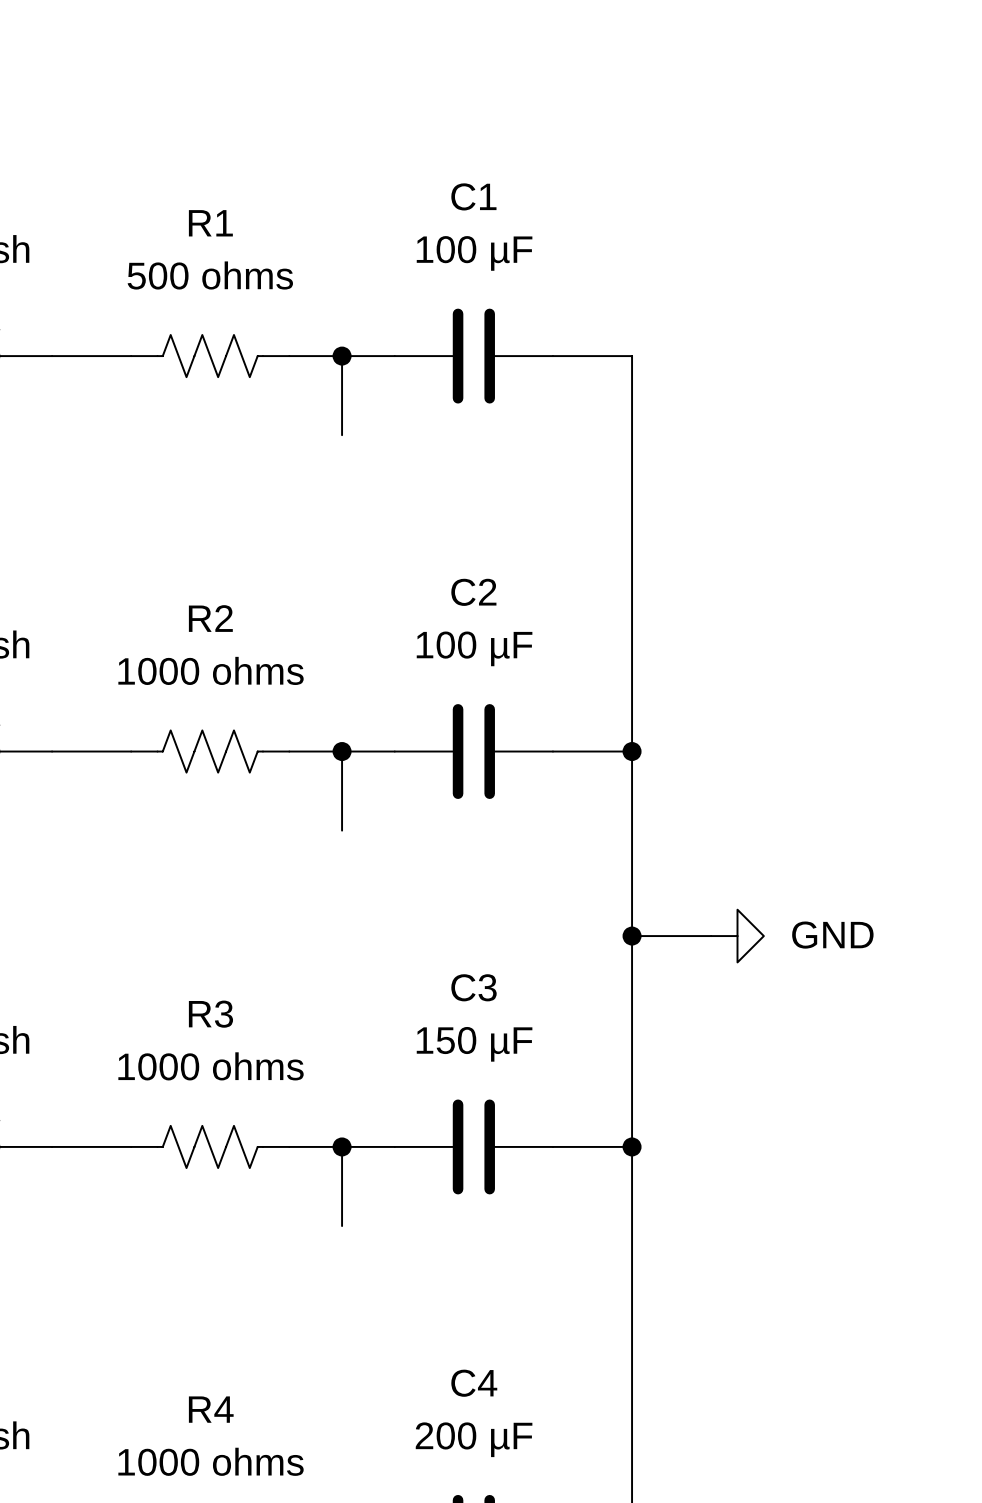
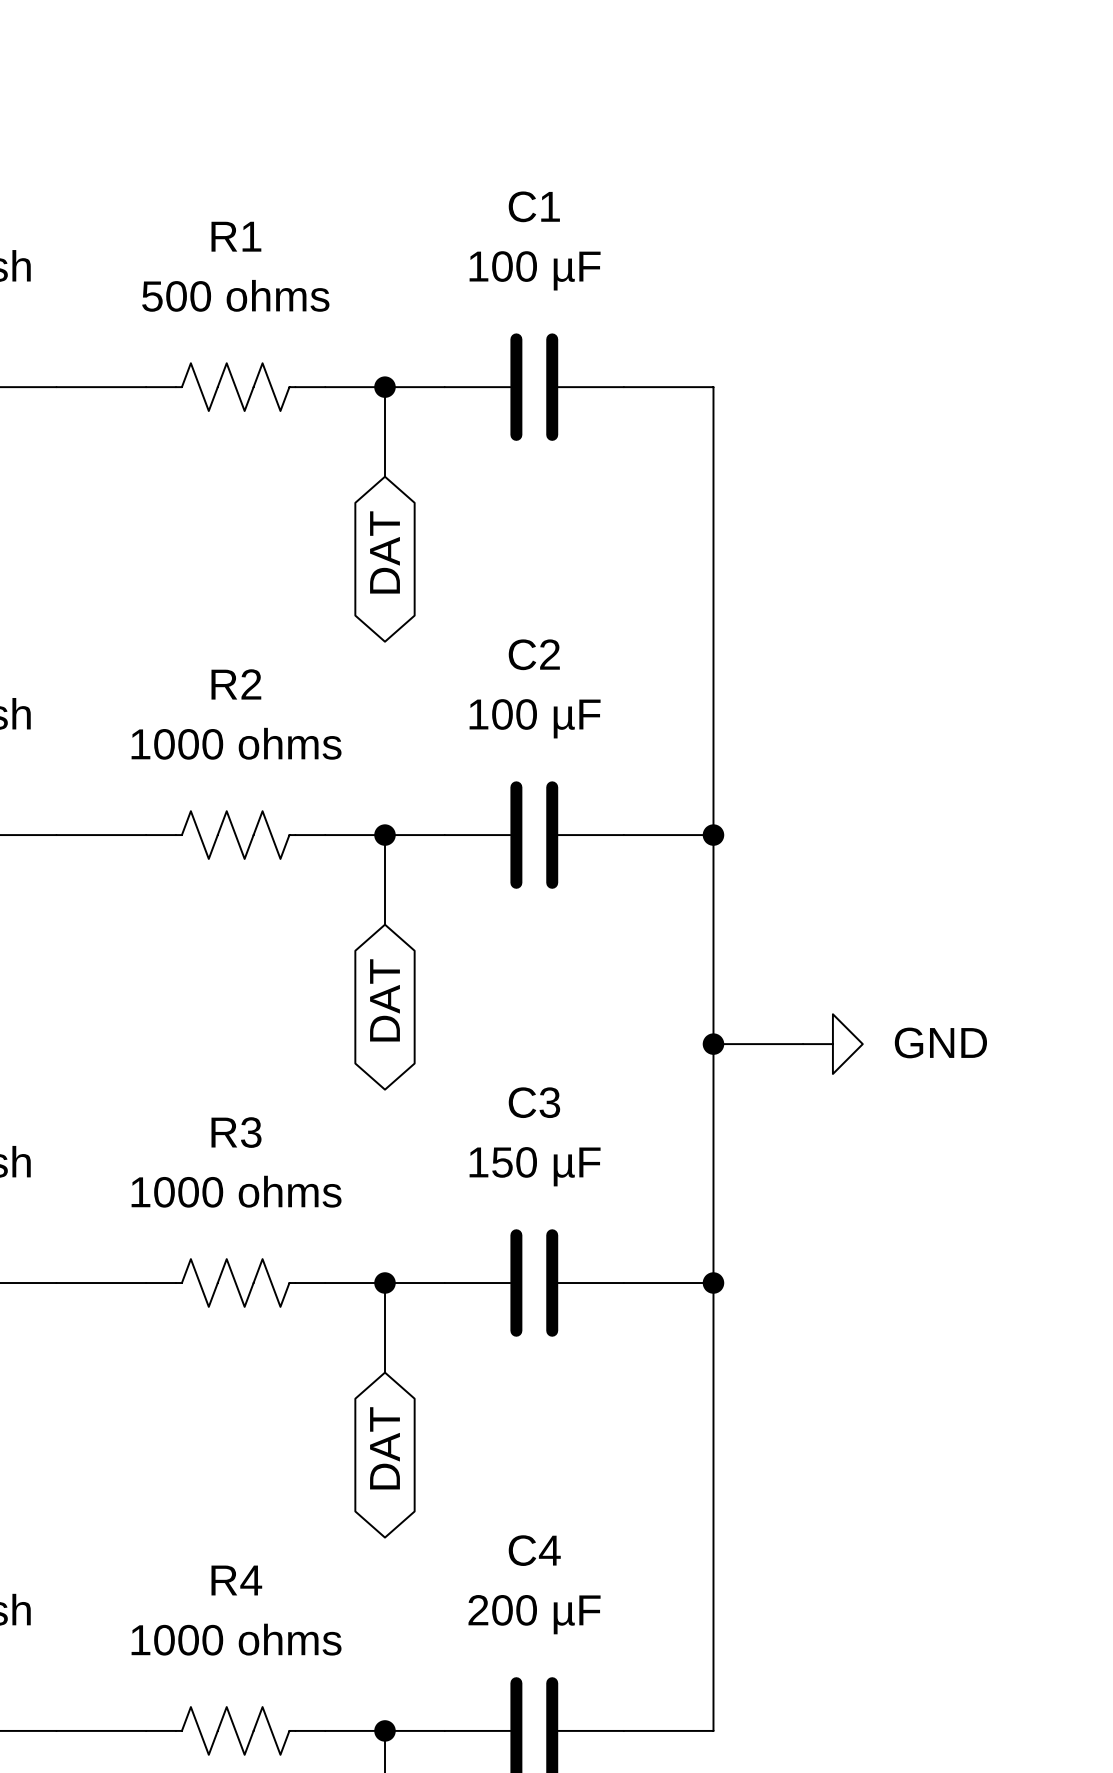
global label: none -> DAT (385, 552)
global label: none -> DAT (385, 1000)
global label: none -> DAT (385, 1448)

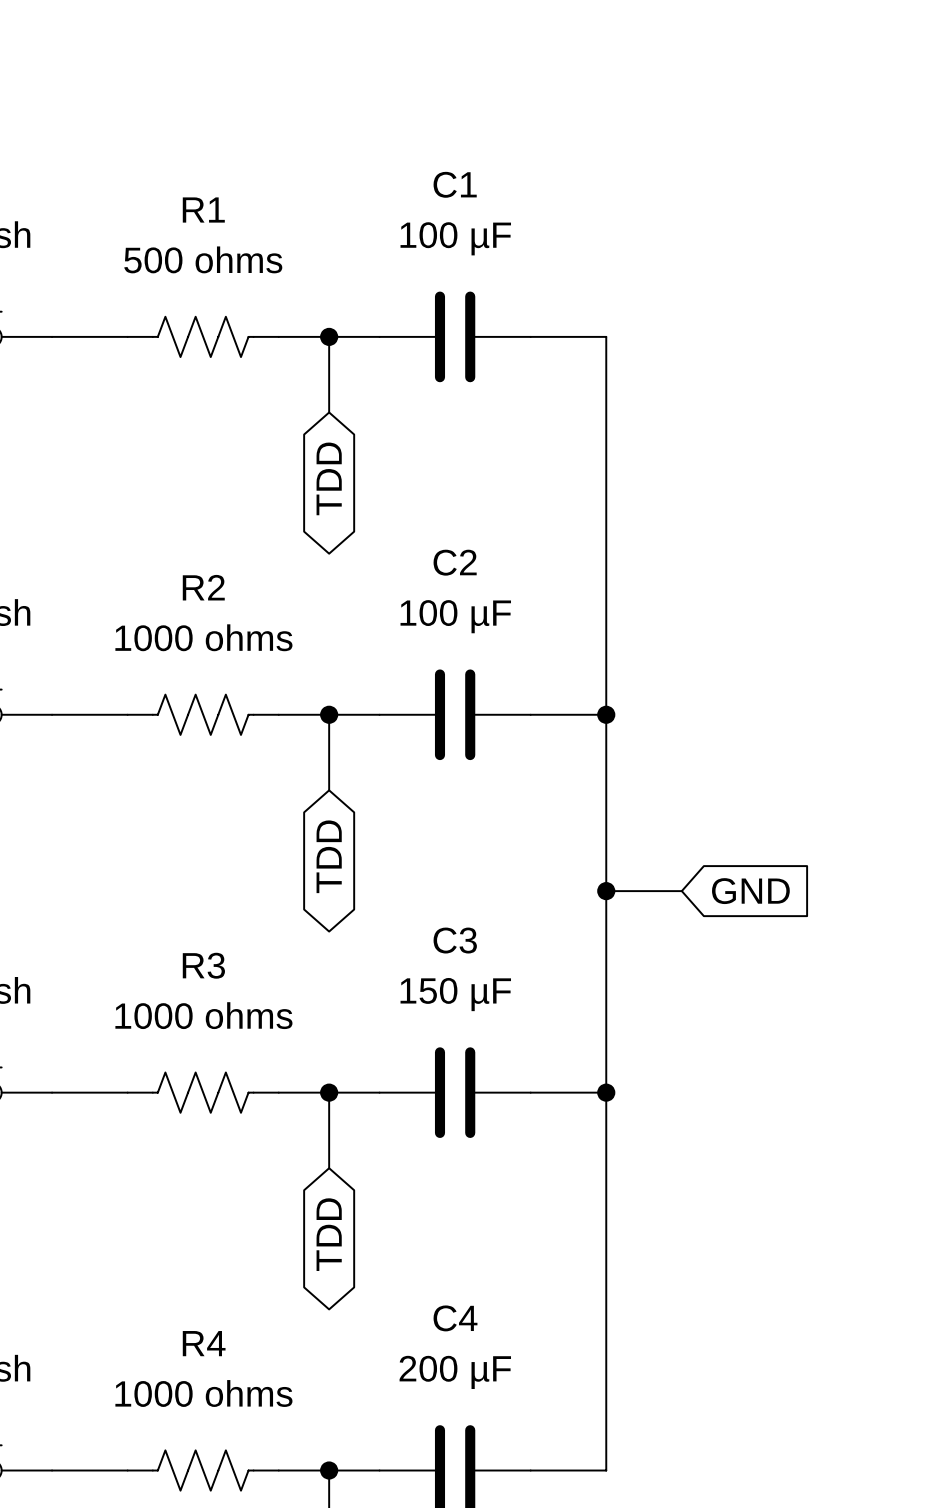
global label: DAT (385, 552) -> TDD (329, 478)
global label: DAT (385, 1000) -> TDD (329, 856)
power symbol: GND (832, 1044) -> none
global label: none -> GND (750, 891)
global label: DAT (385, 1448) -> TDD (329, 1234)

